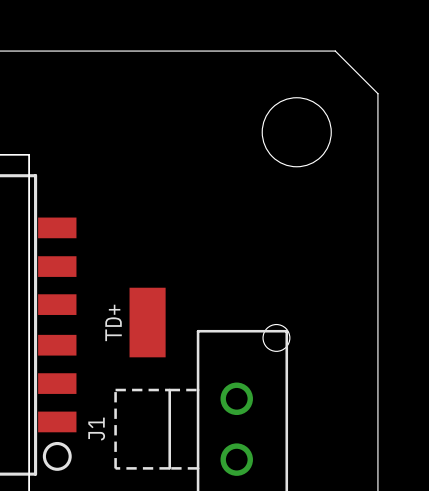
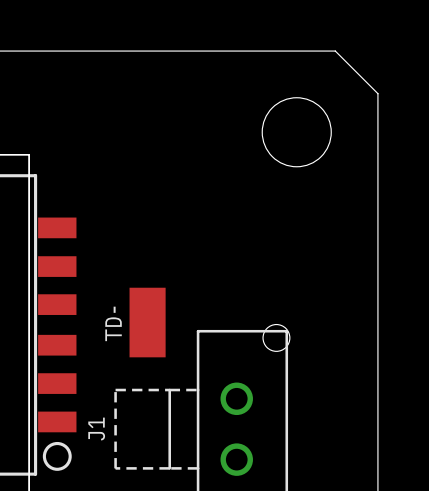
TD+ name: TD+ (113, 322) -> TD- (113, 323)

